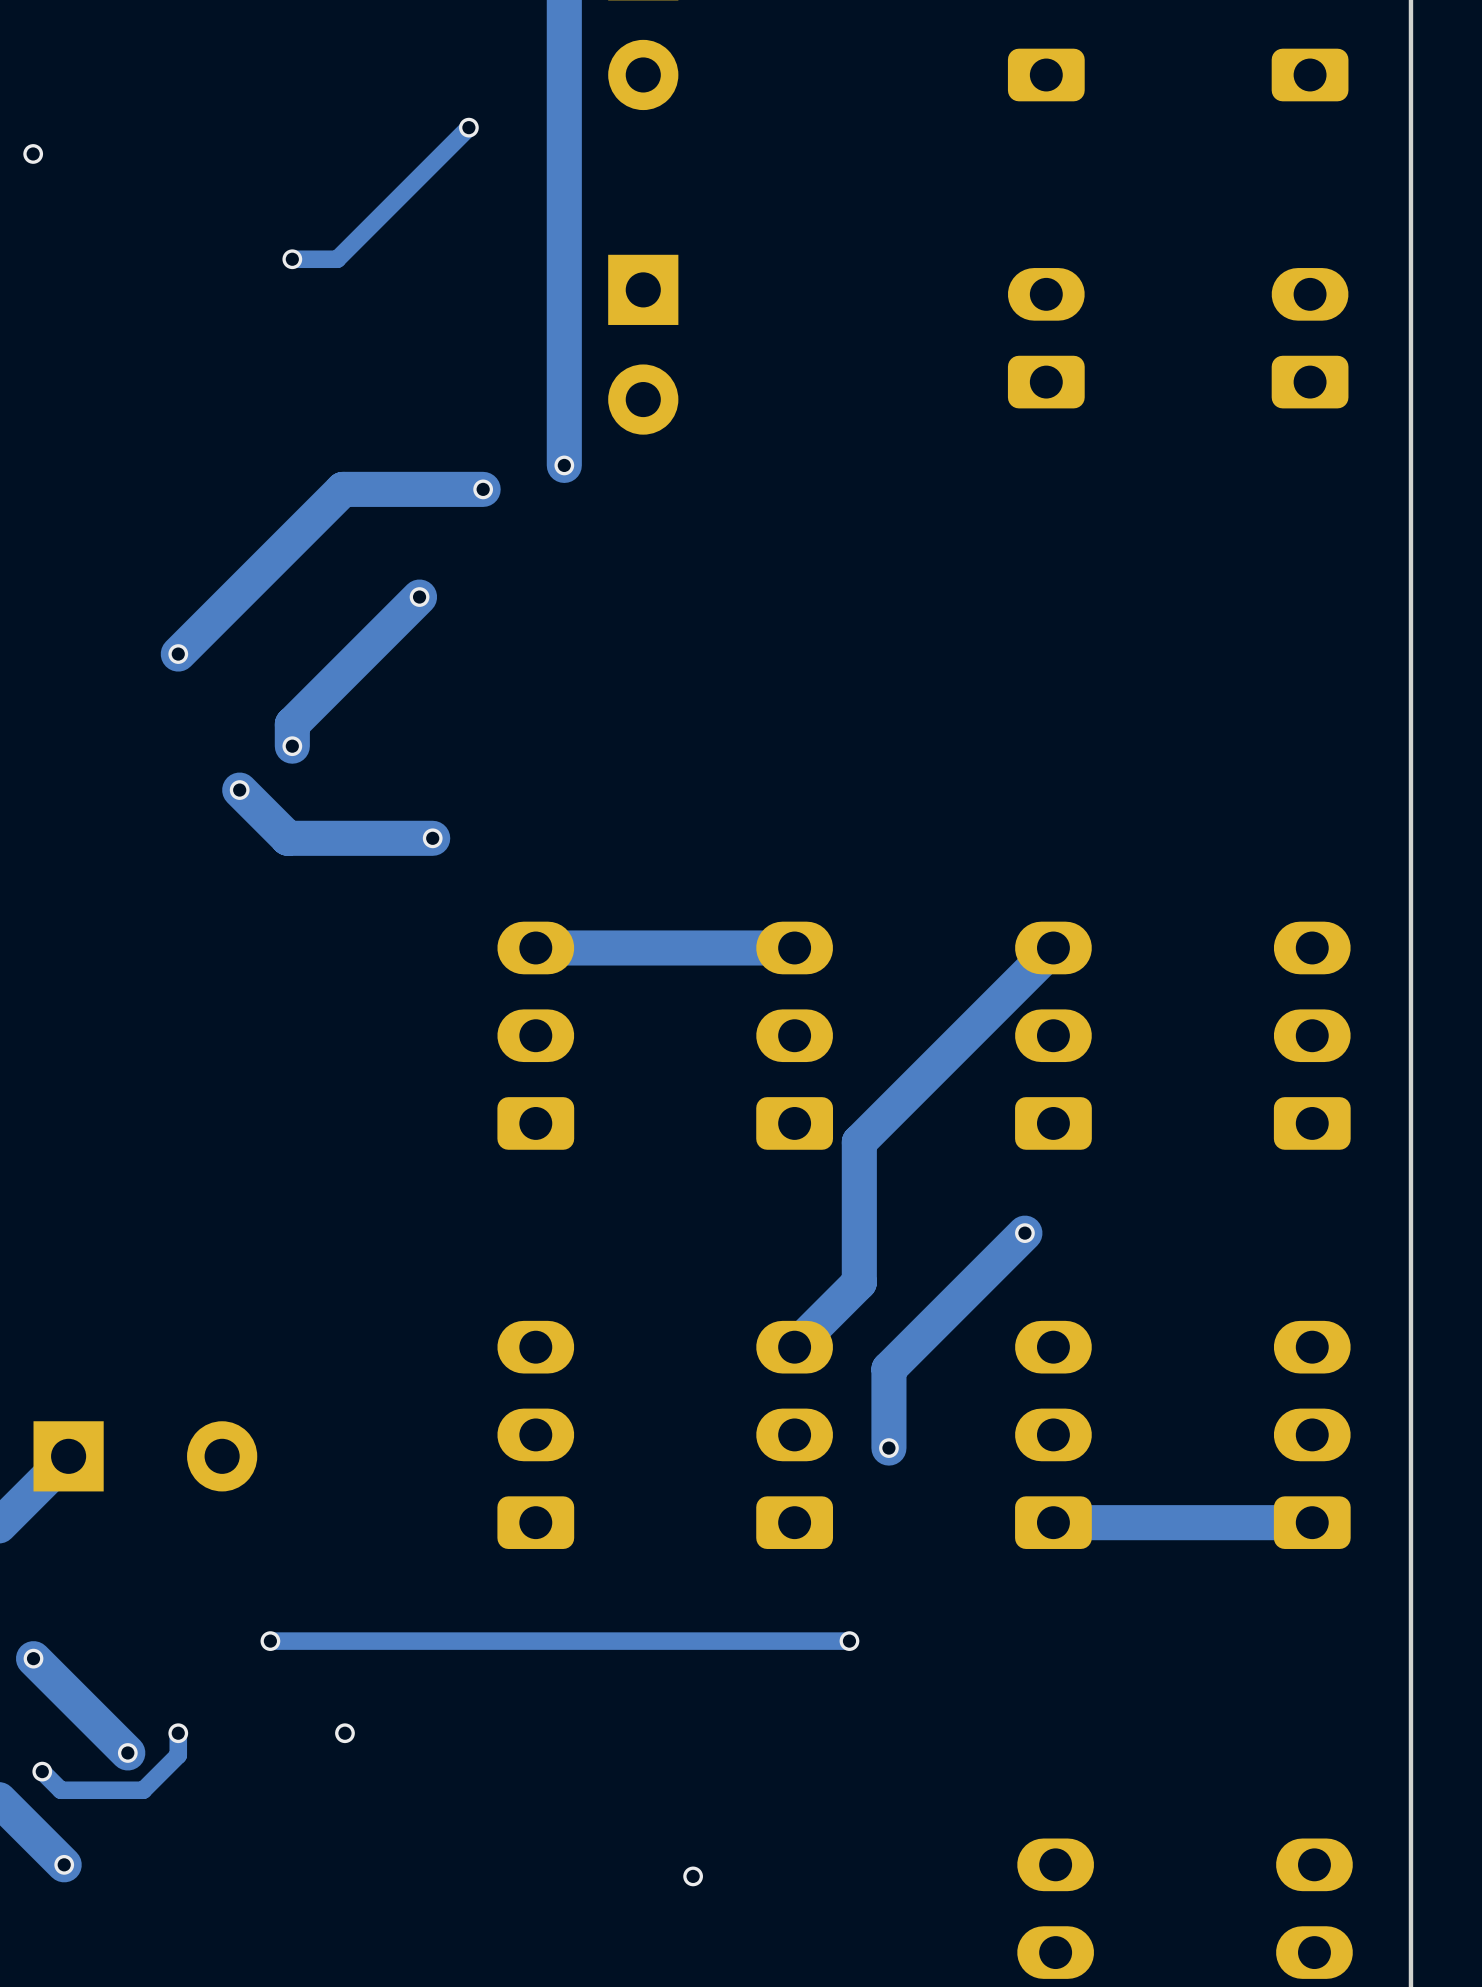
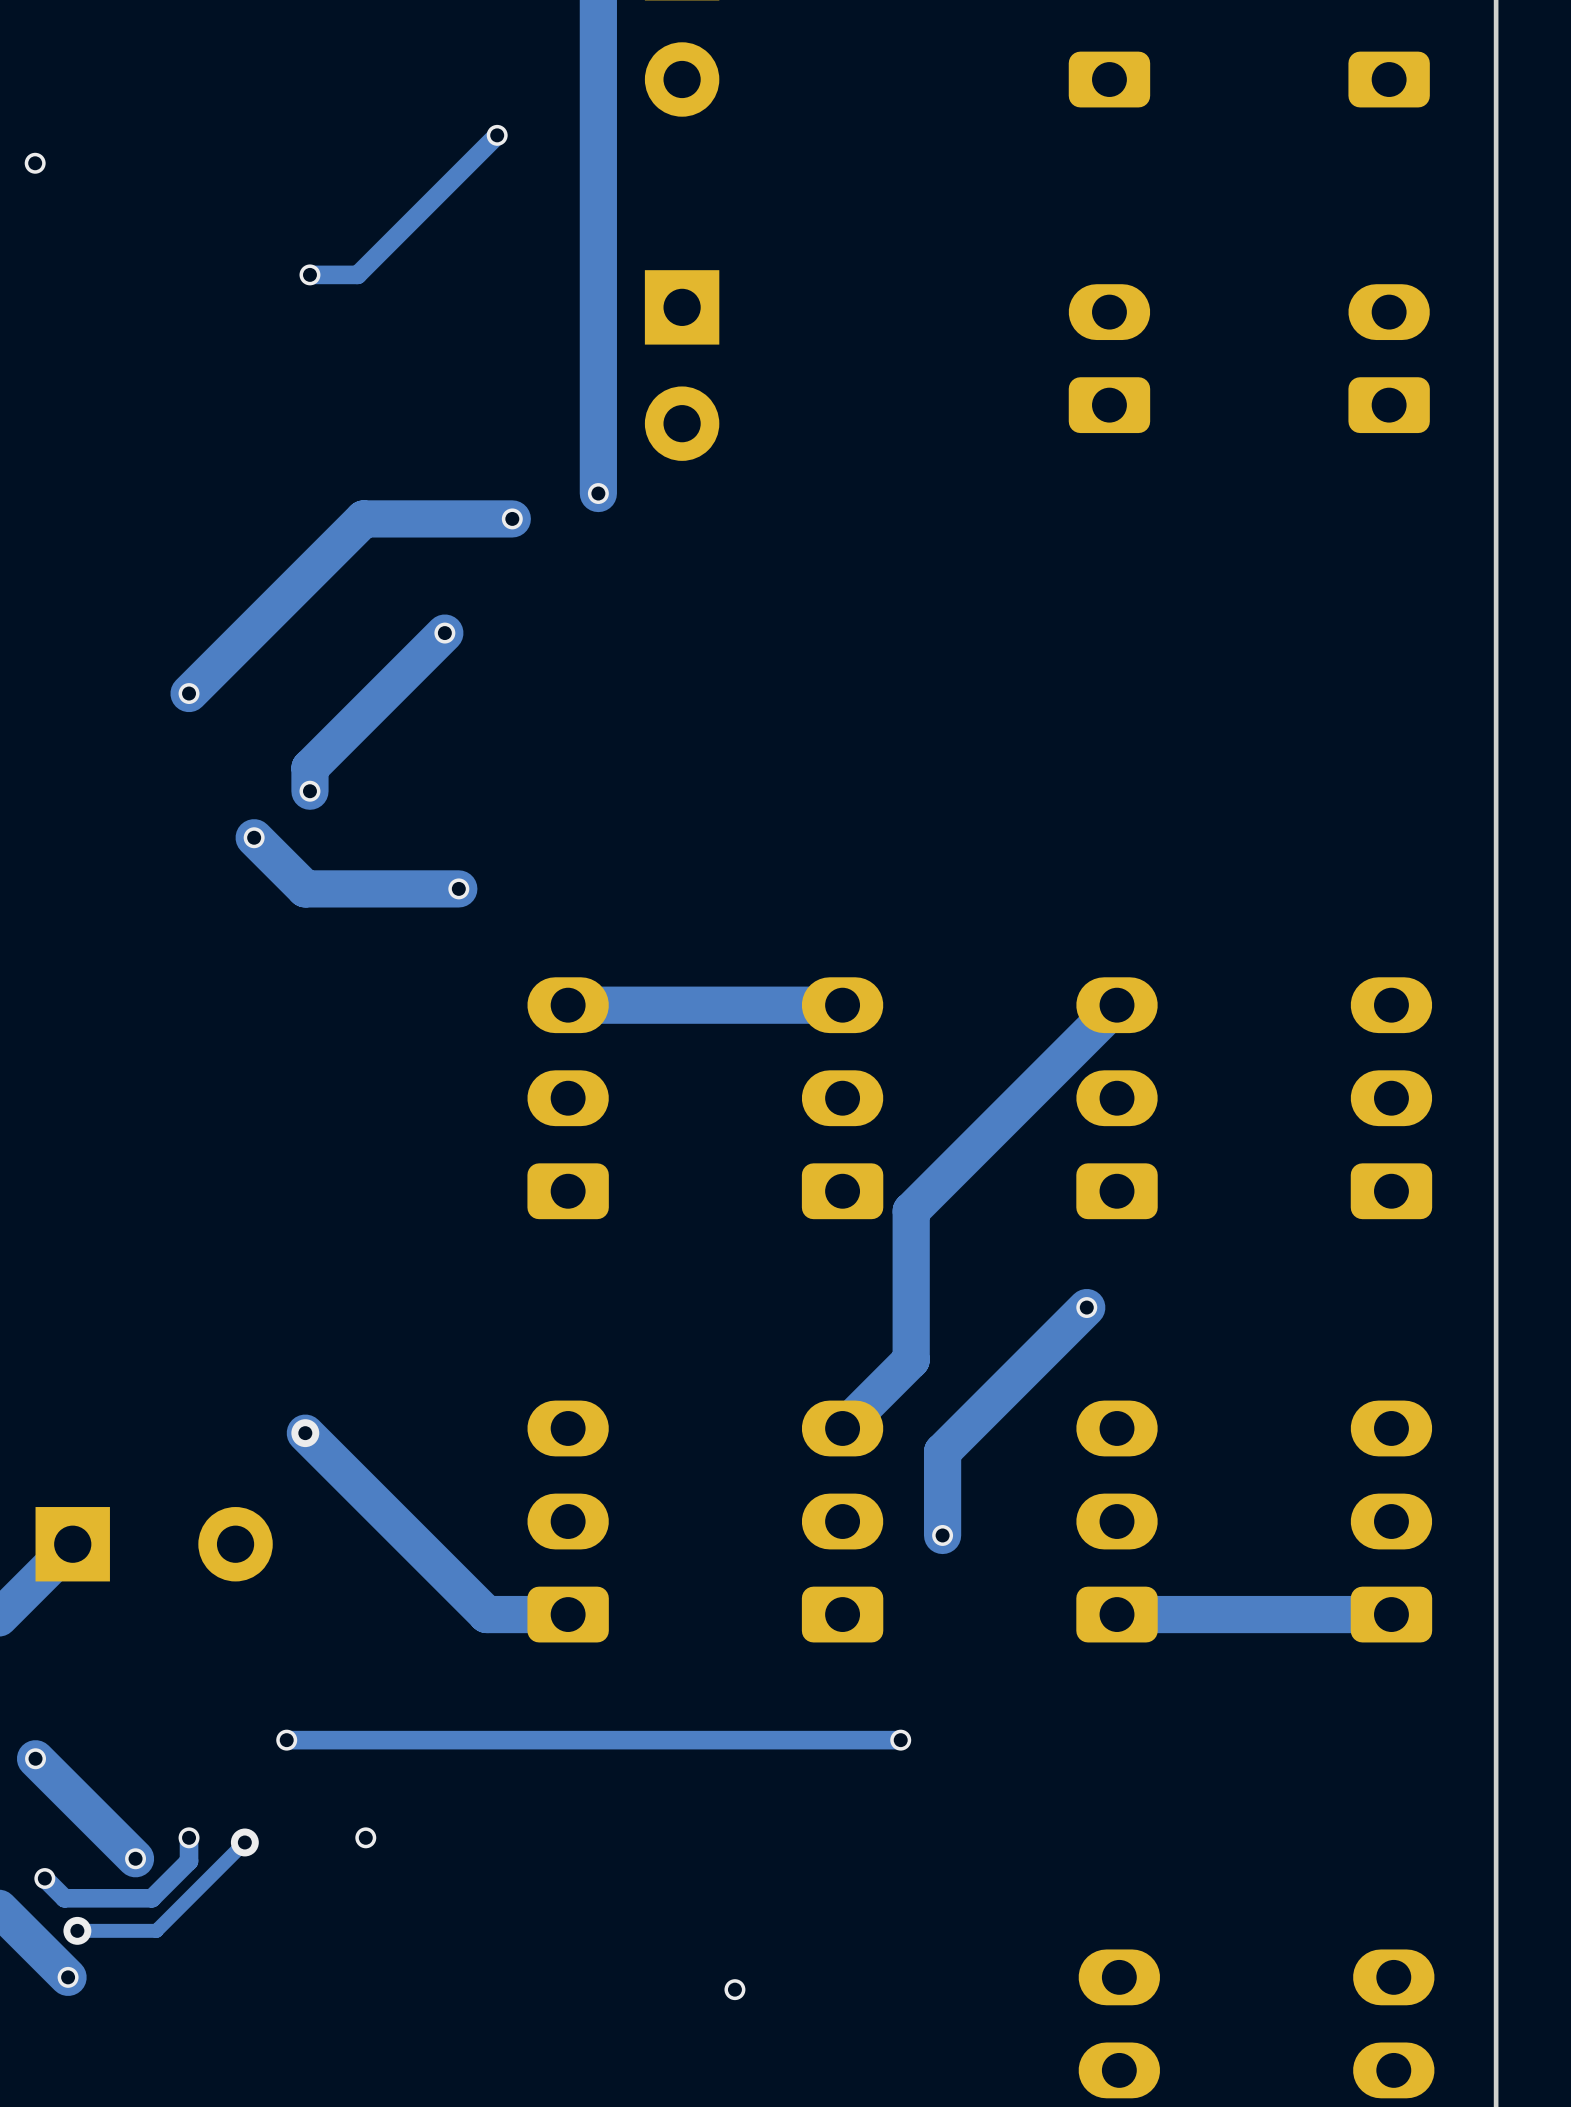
track: none -> (305, 1433) (486, 1614) (568, 1614)
via: none -> (305, 1433)
track: none -> (244, 1842) (156, 1930) (77, 1930)
via: none -> (244, 1842)
via: none -> (77, 1930)

